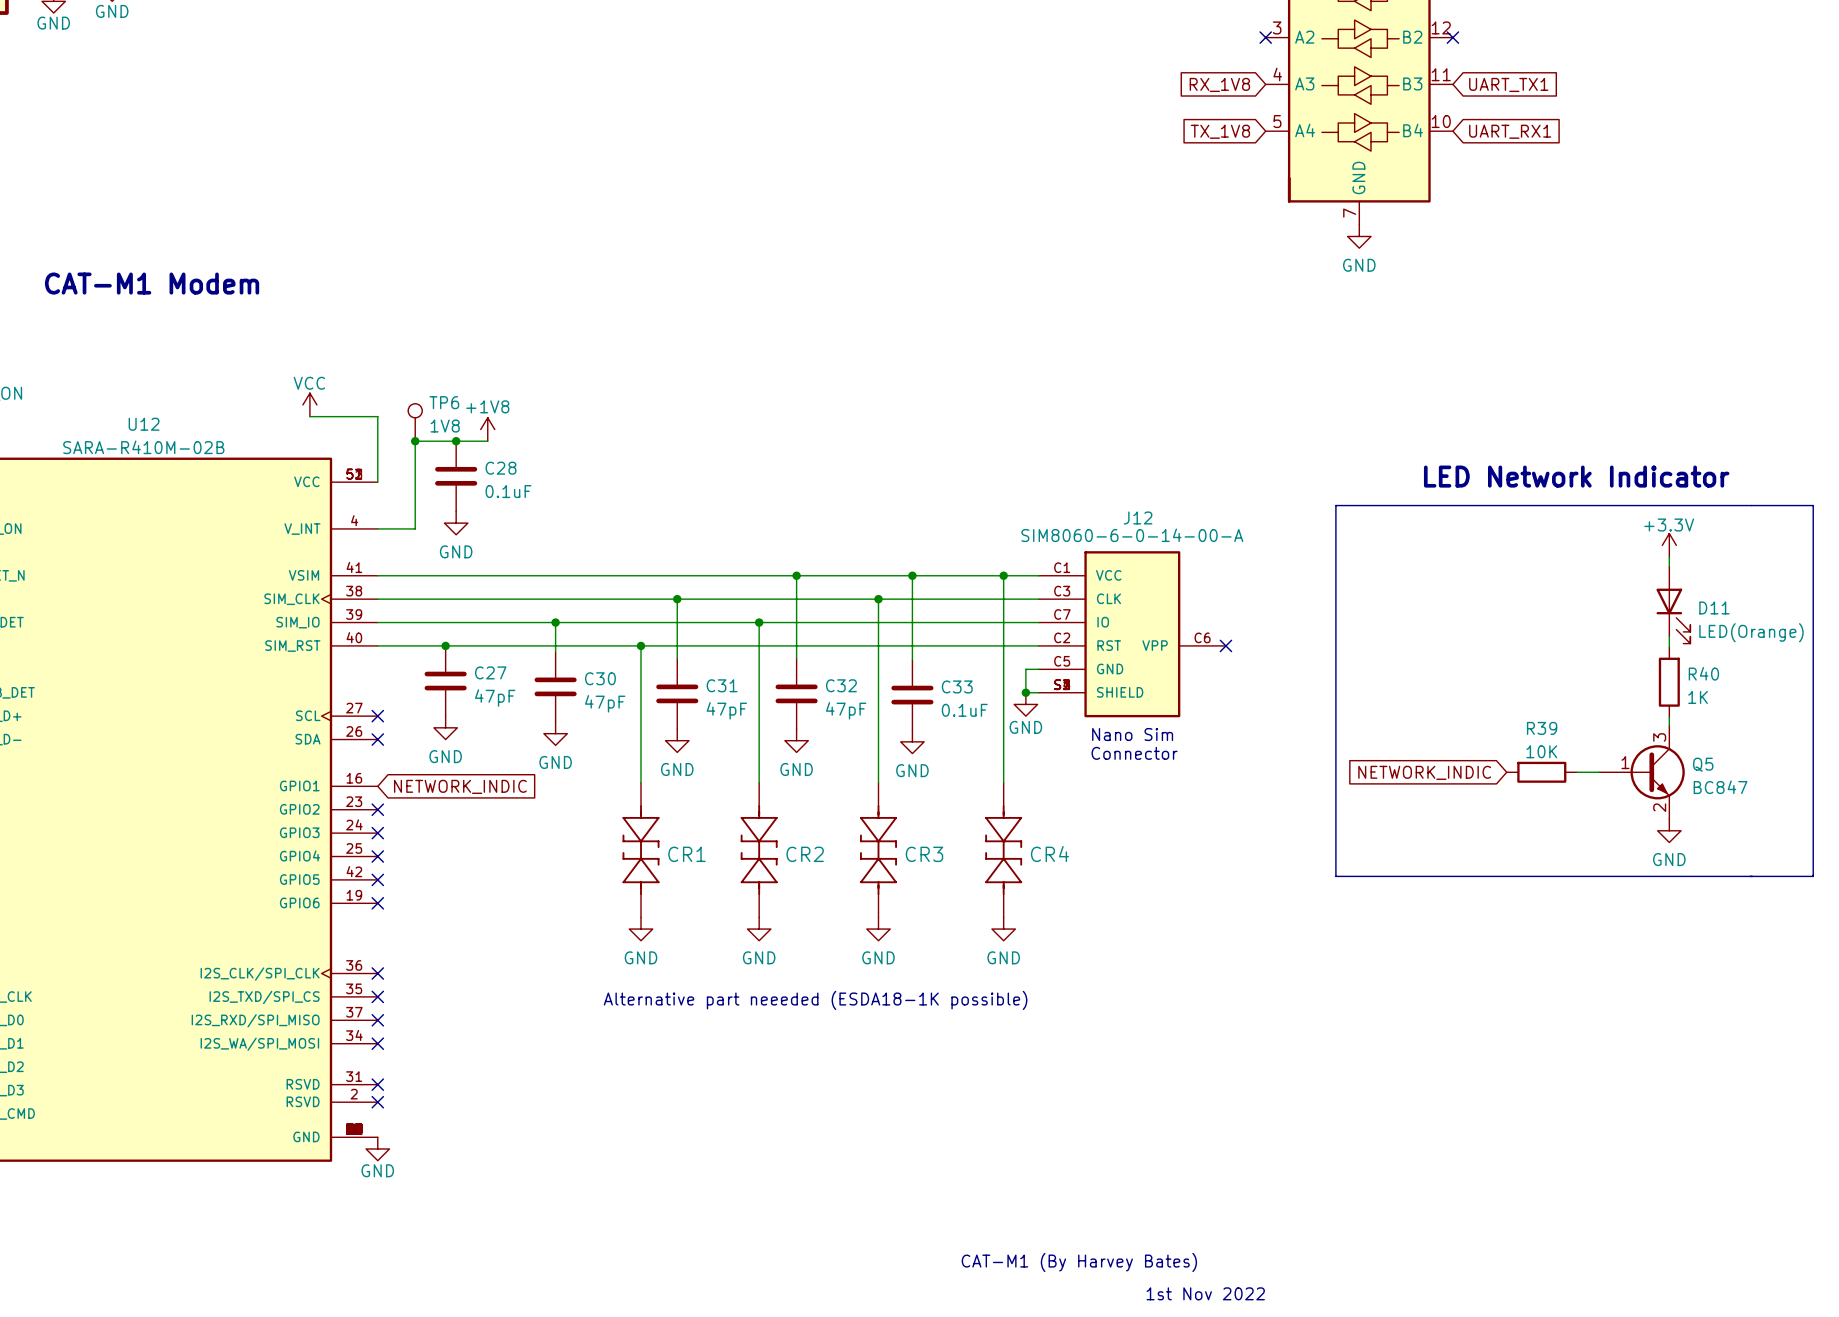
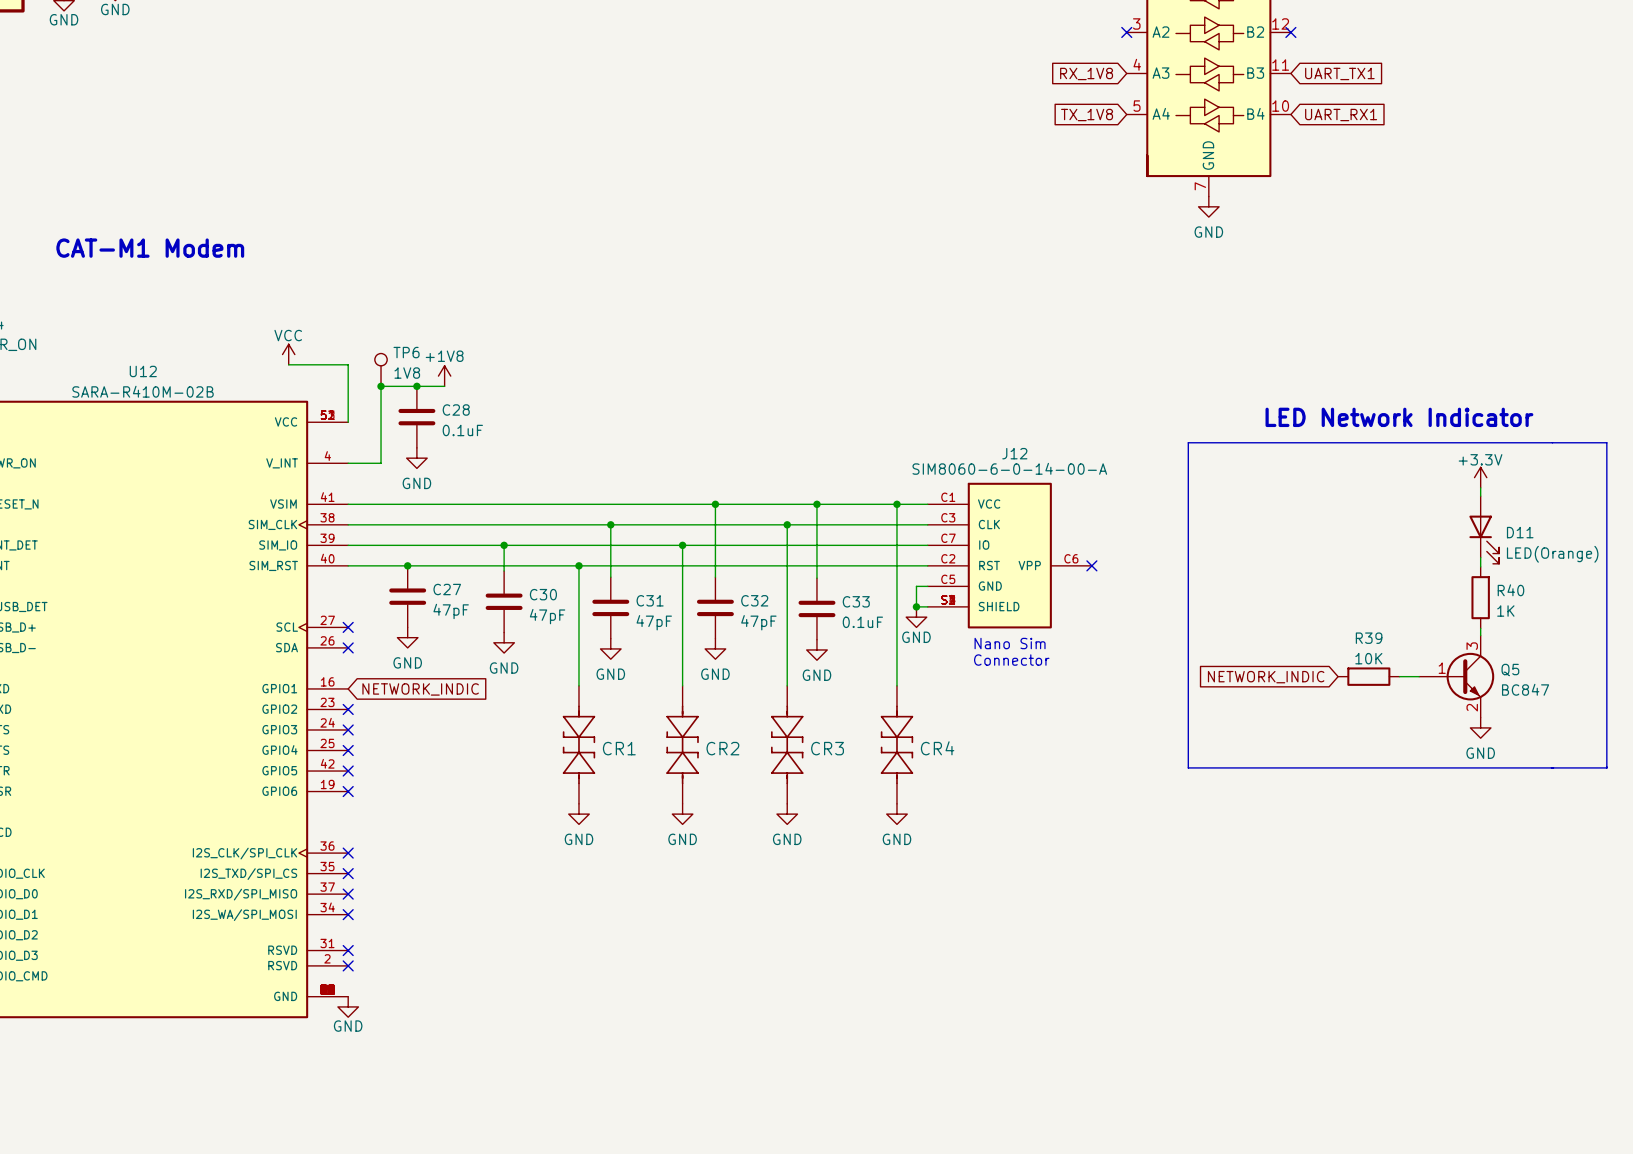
text: Alternative part neeeded (ESDA18-1K possible) (815, 1000) -> none
text: CAT-M1 (By Harvey Bates) (1079, 1262) -> none
text: 1st Nov 2022 (1205, 1293) -> none

